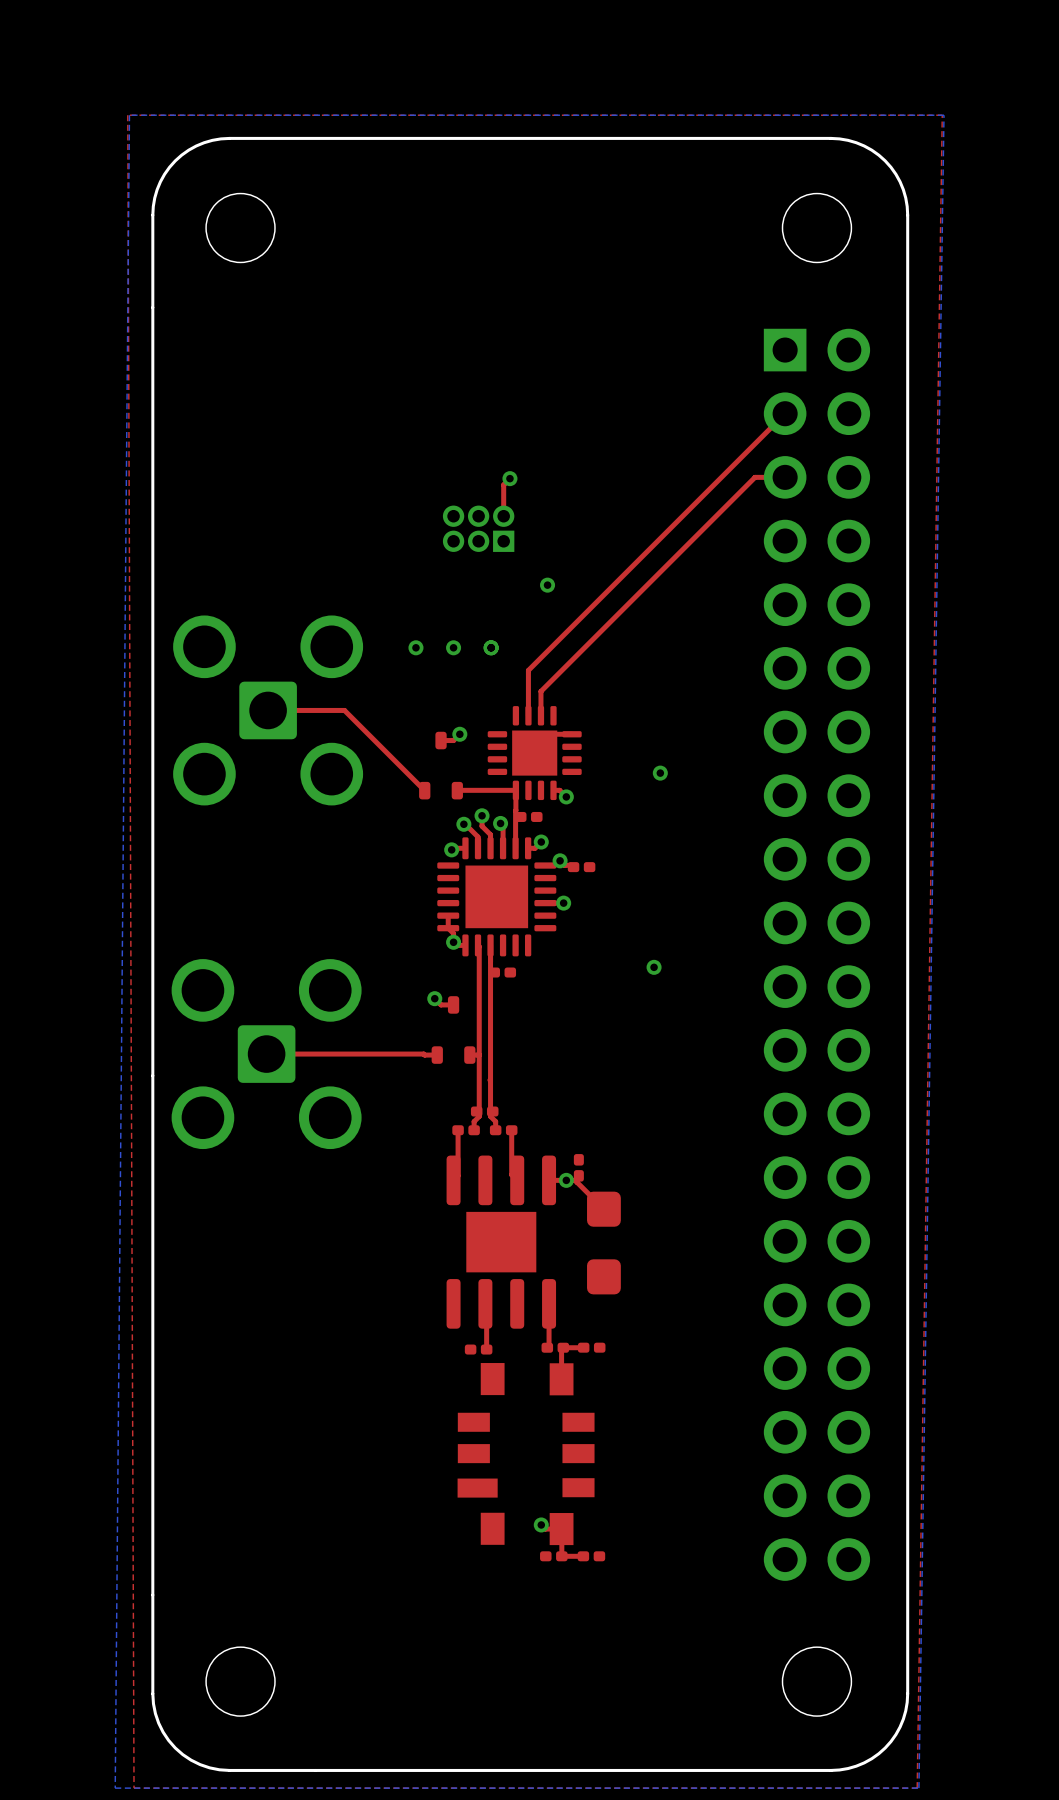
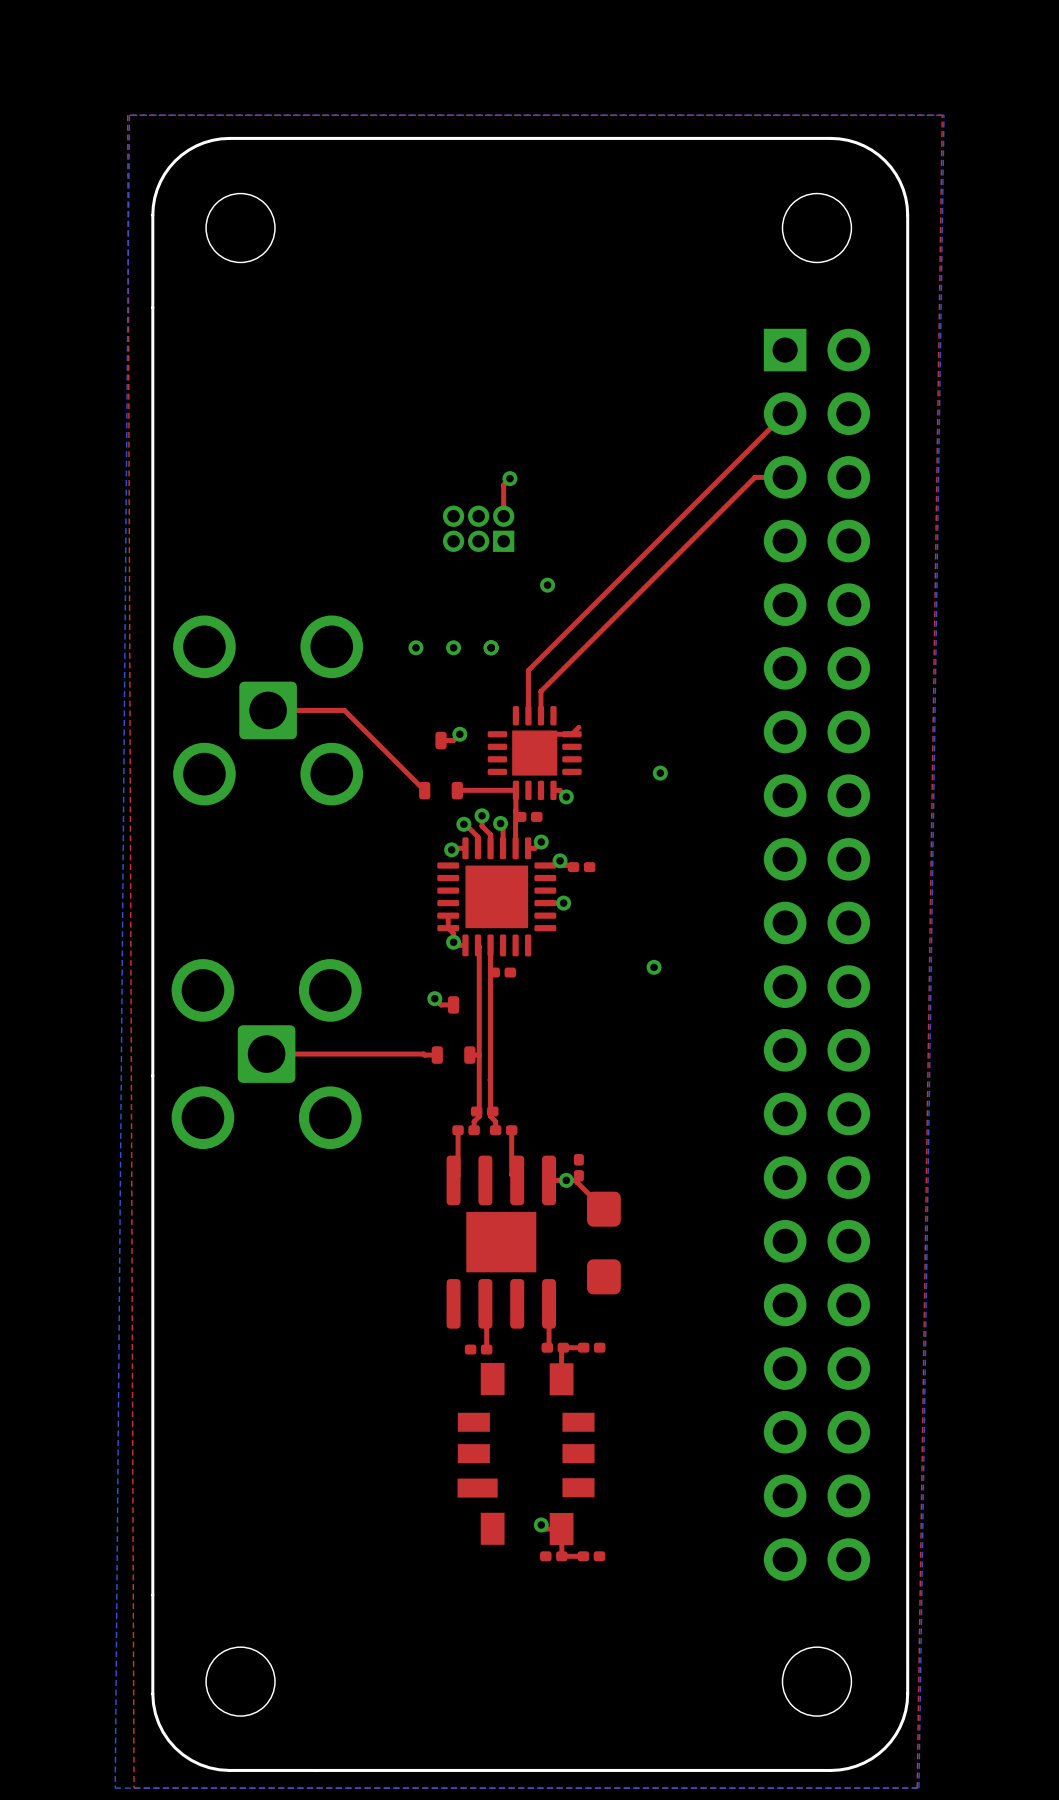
top track: none -> (578, 727) (571, 734)

